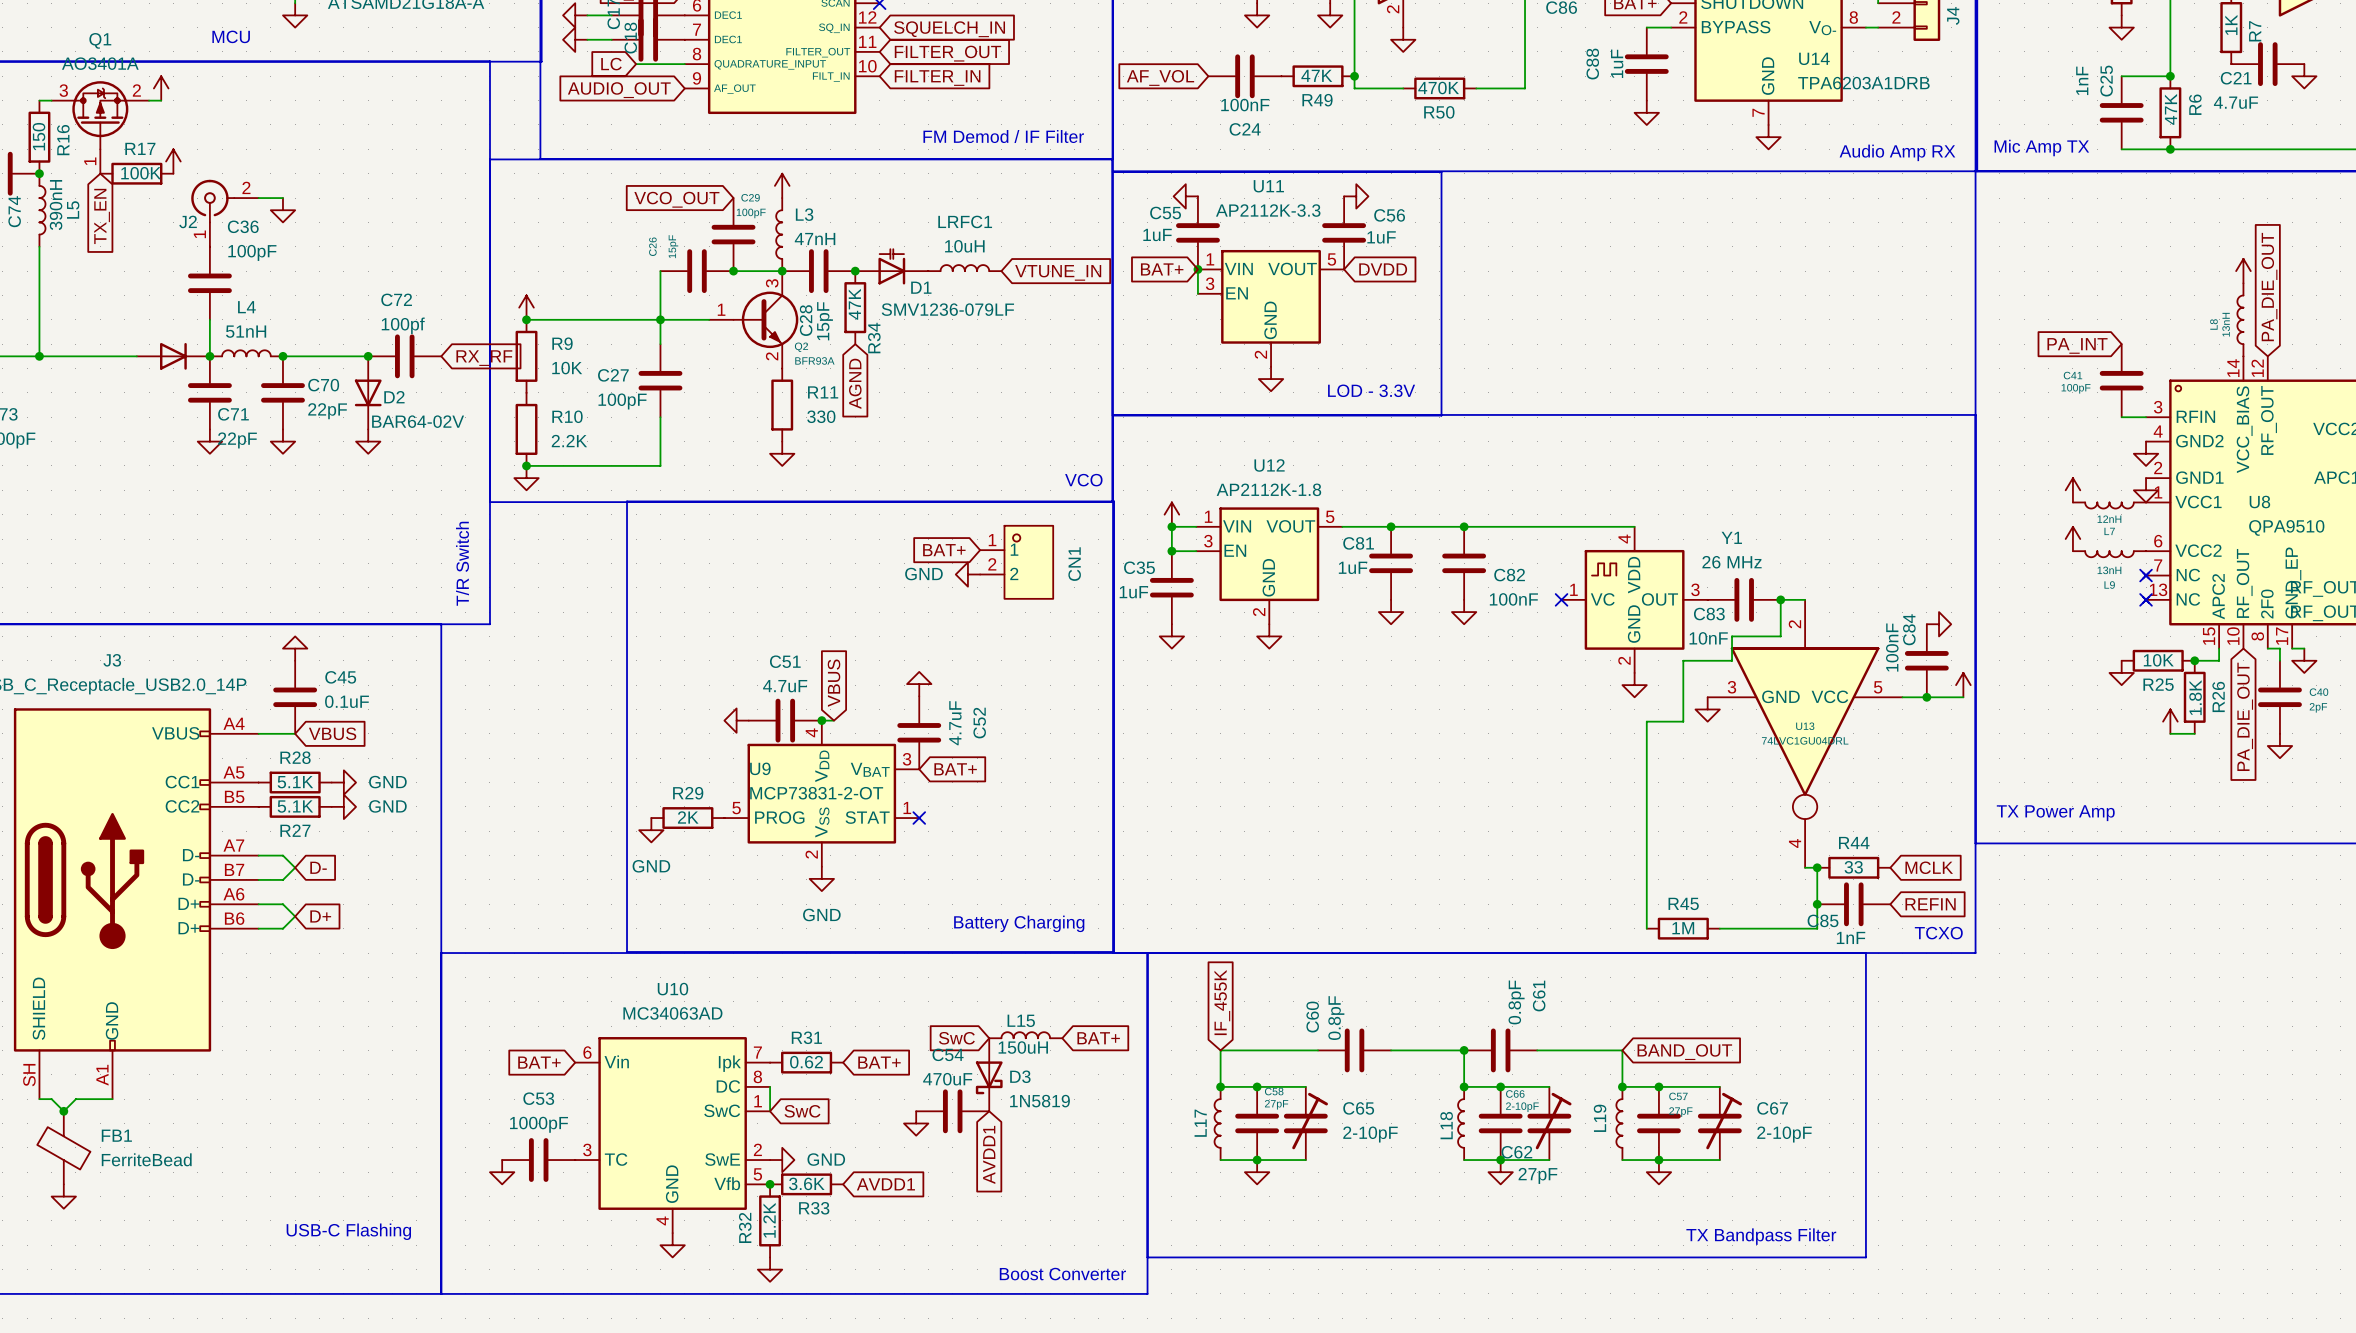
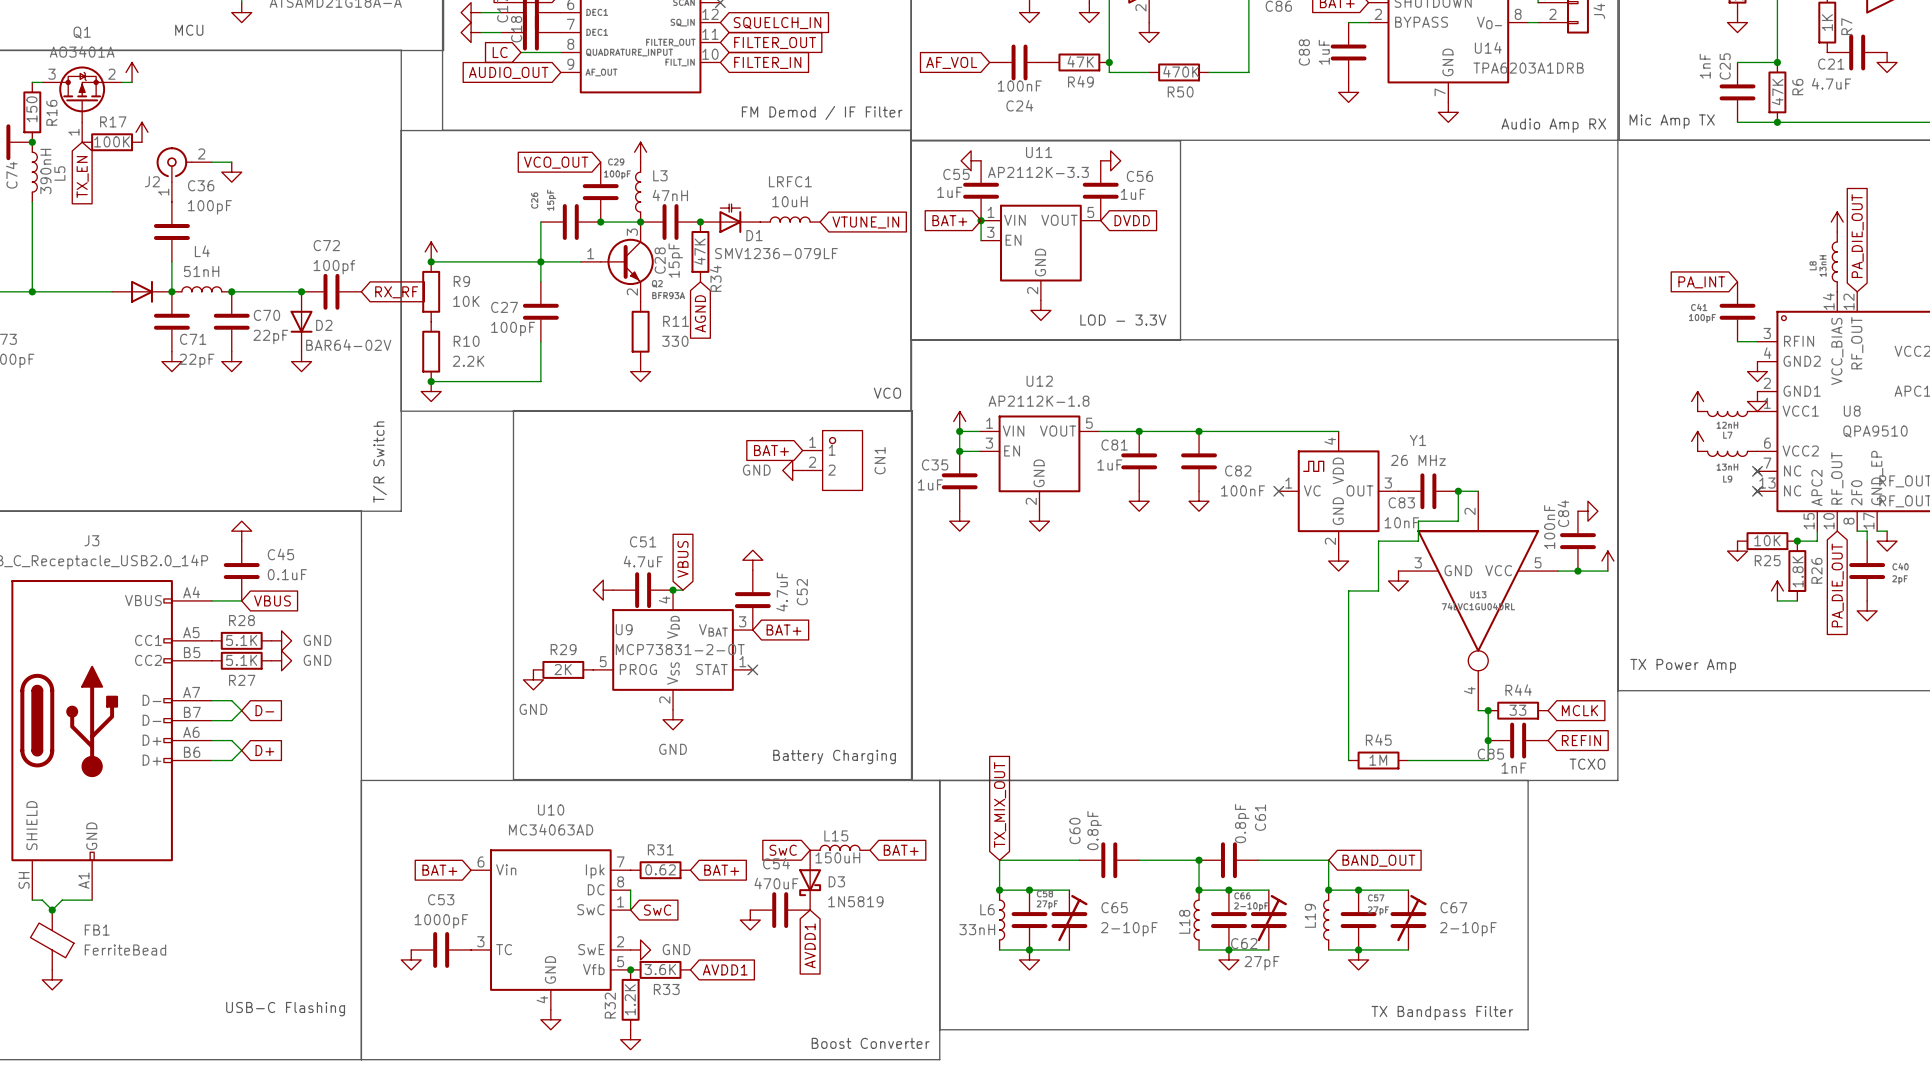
global label: IF_455K (1222, 1002) -> TX_MIX_OUT (1000, 805)
L17: (1217, 1123) -> none
L6: none -> 33nH (1002, 920)

